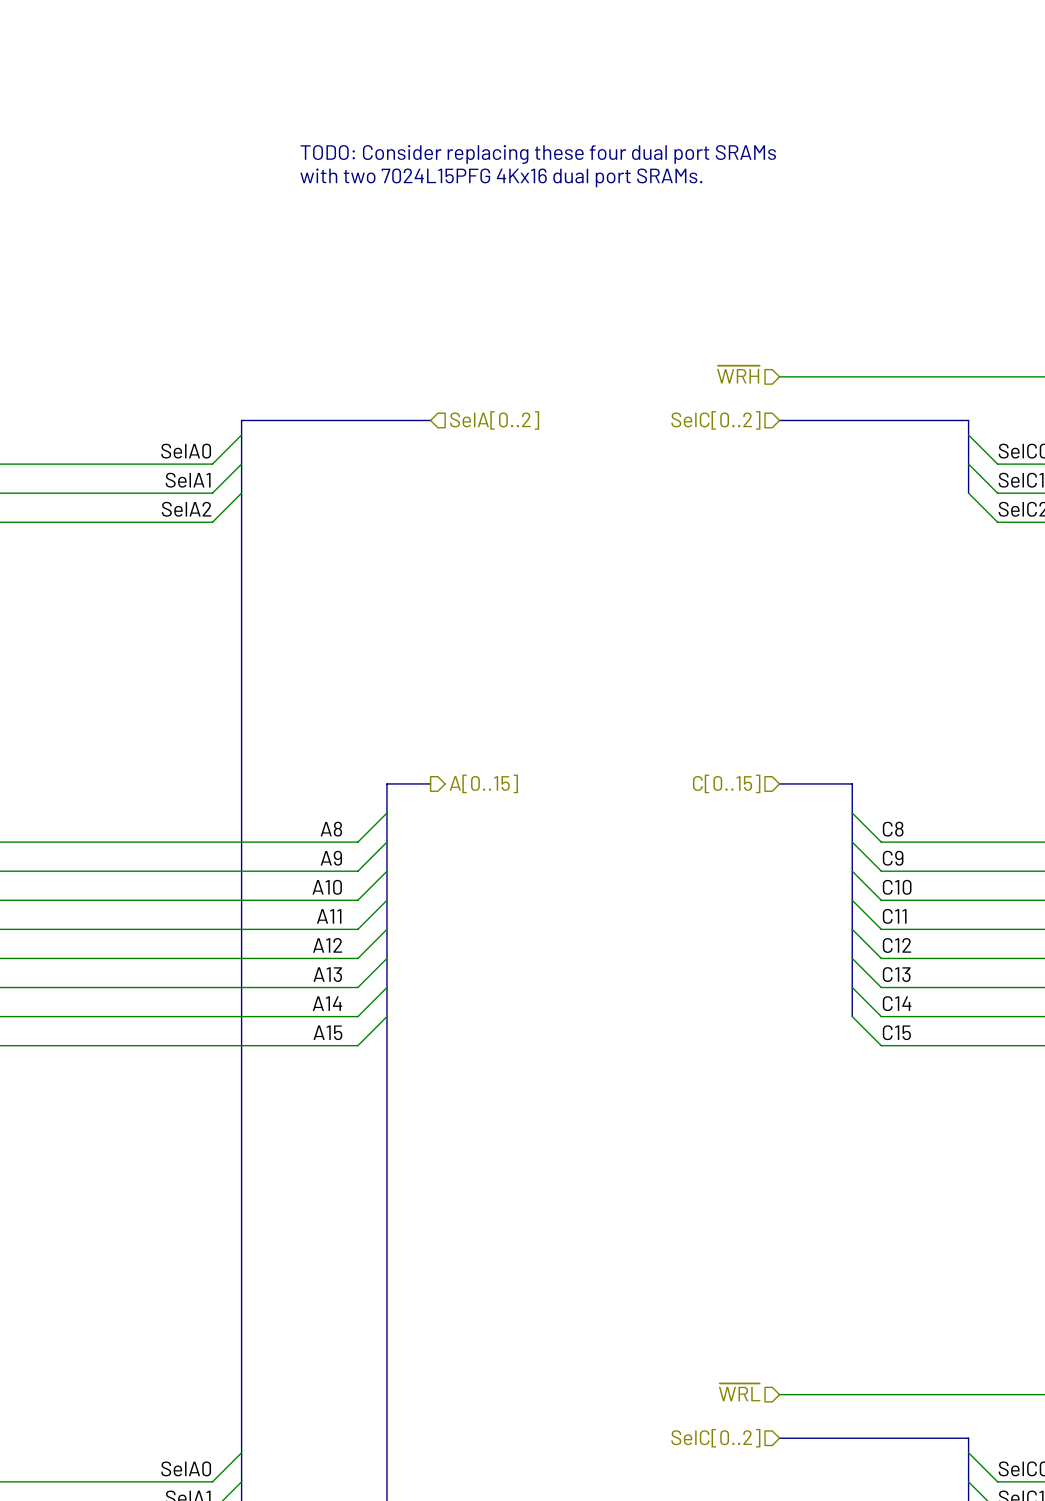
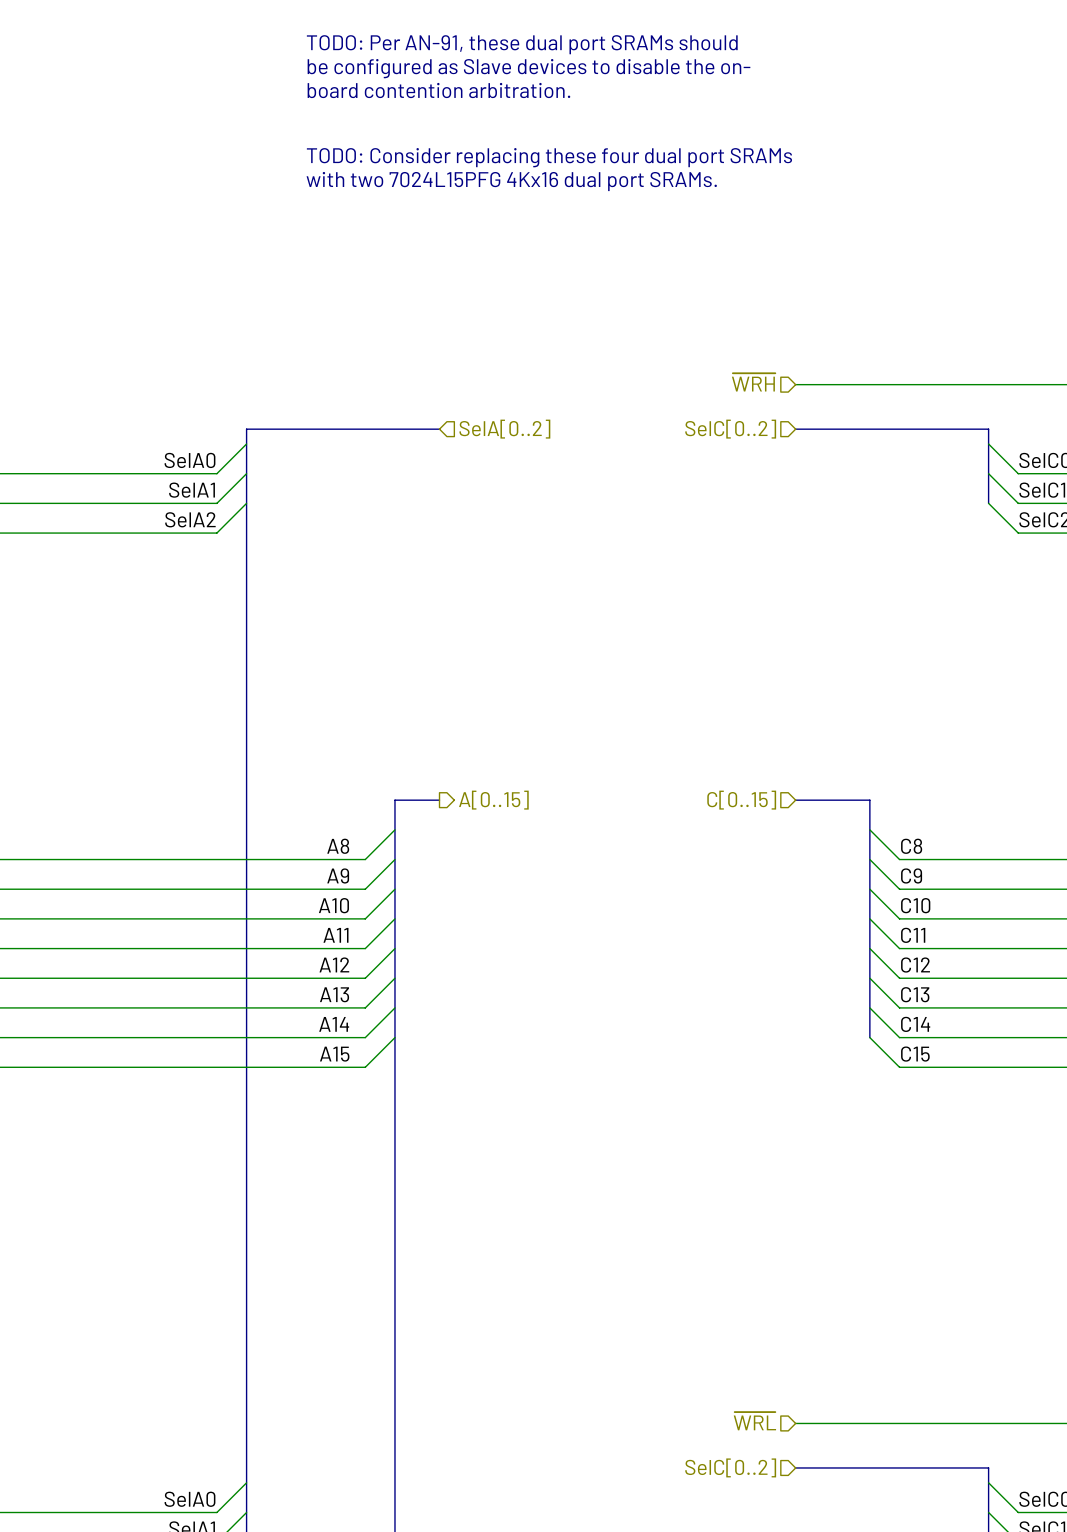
text: none -> TODO: Per AN-91, these dual port SRAMs should (522, 44)
text: none -> be configured as Slave devices to disable the on- (528, 68)
text: none -> board contention arbitration. (438, 90)

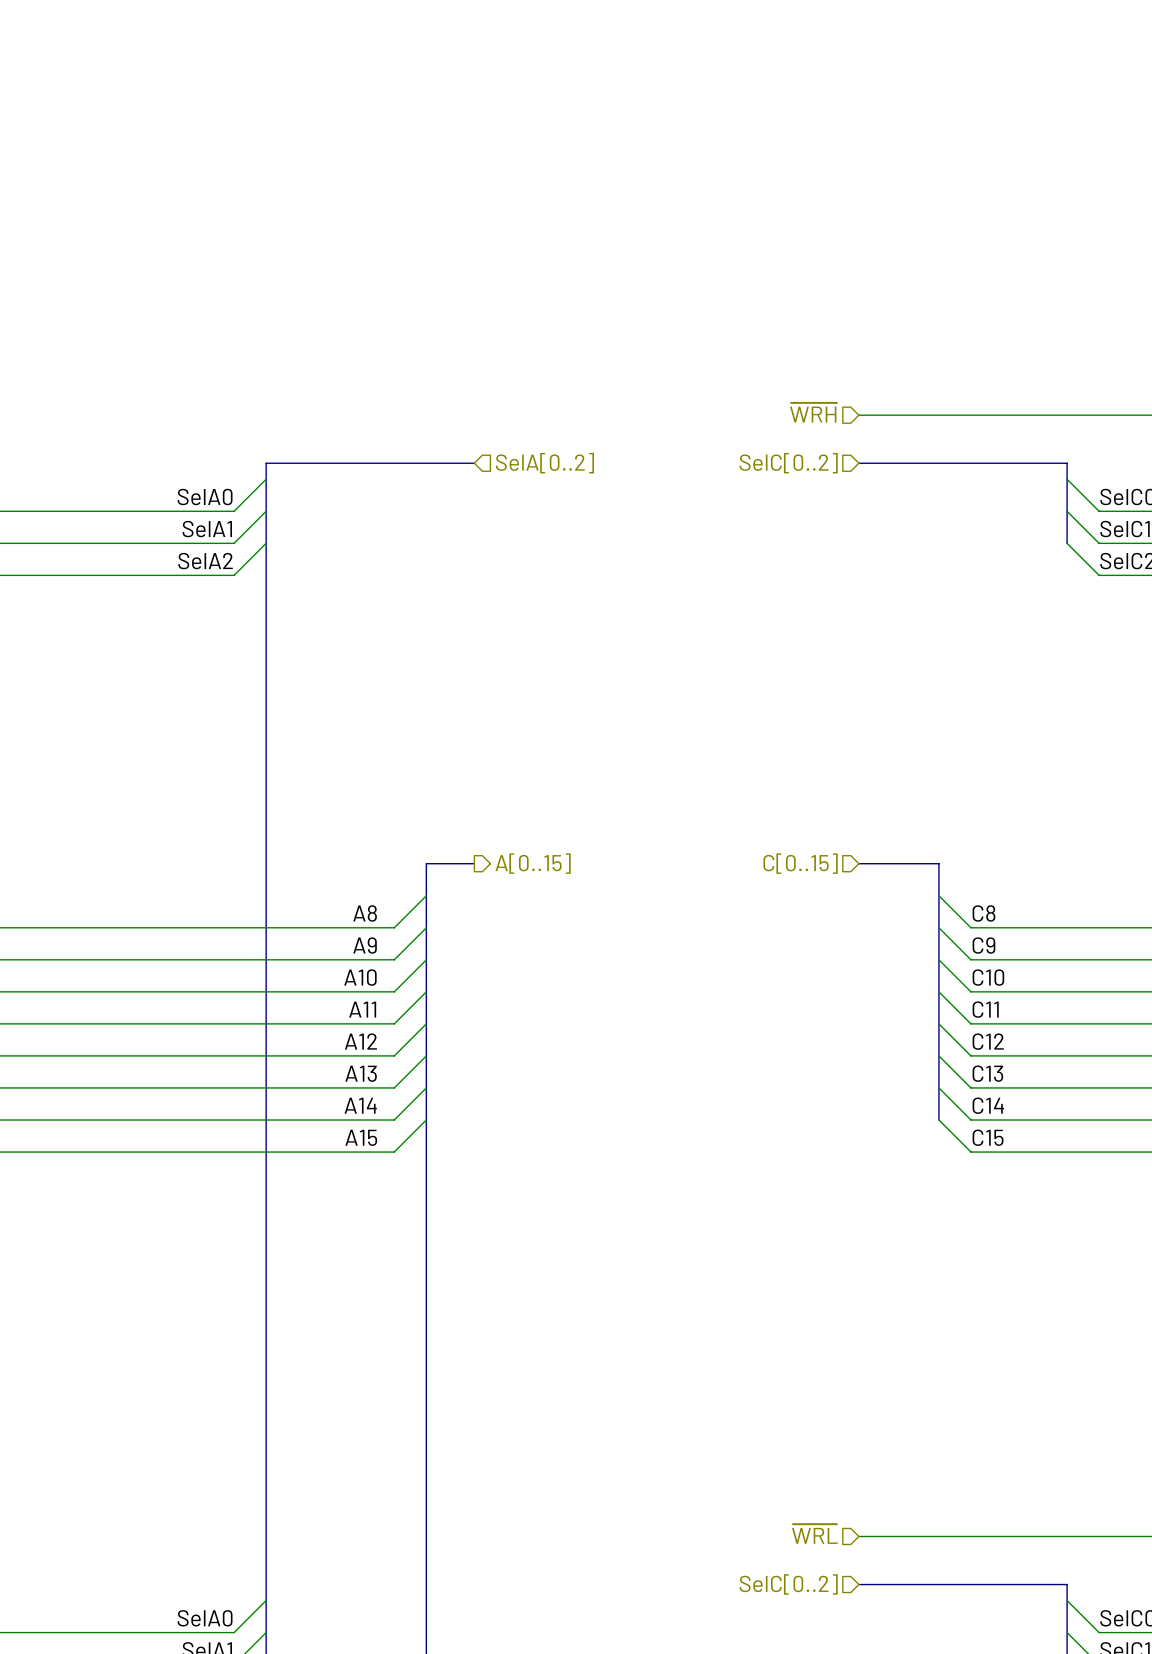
text: TODO: Per AN-91, these dual port SRAMs should (522, 44) -> none
text: be configured as Slave devices to disable the on- (528, 68) -> none
text: board contention arbitration. (438, 90) -> none
text: TODO: Consider replacing these four dual port SRAMs (549, 157) -> none
text: with two 7024L15PFG 4Kx16 dual port SRAMs. (511, 181) -> none

